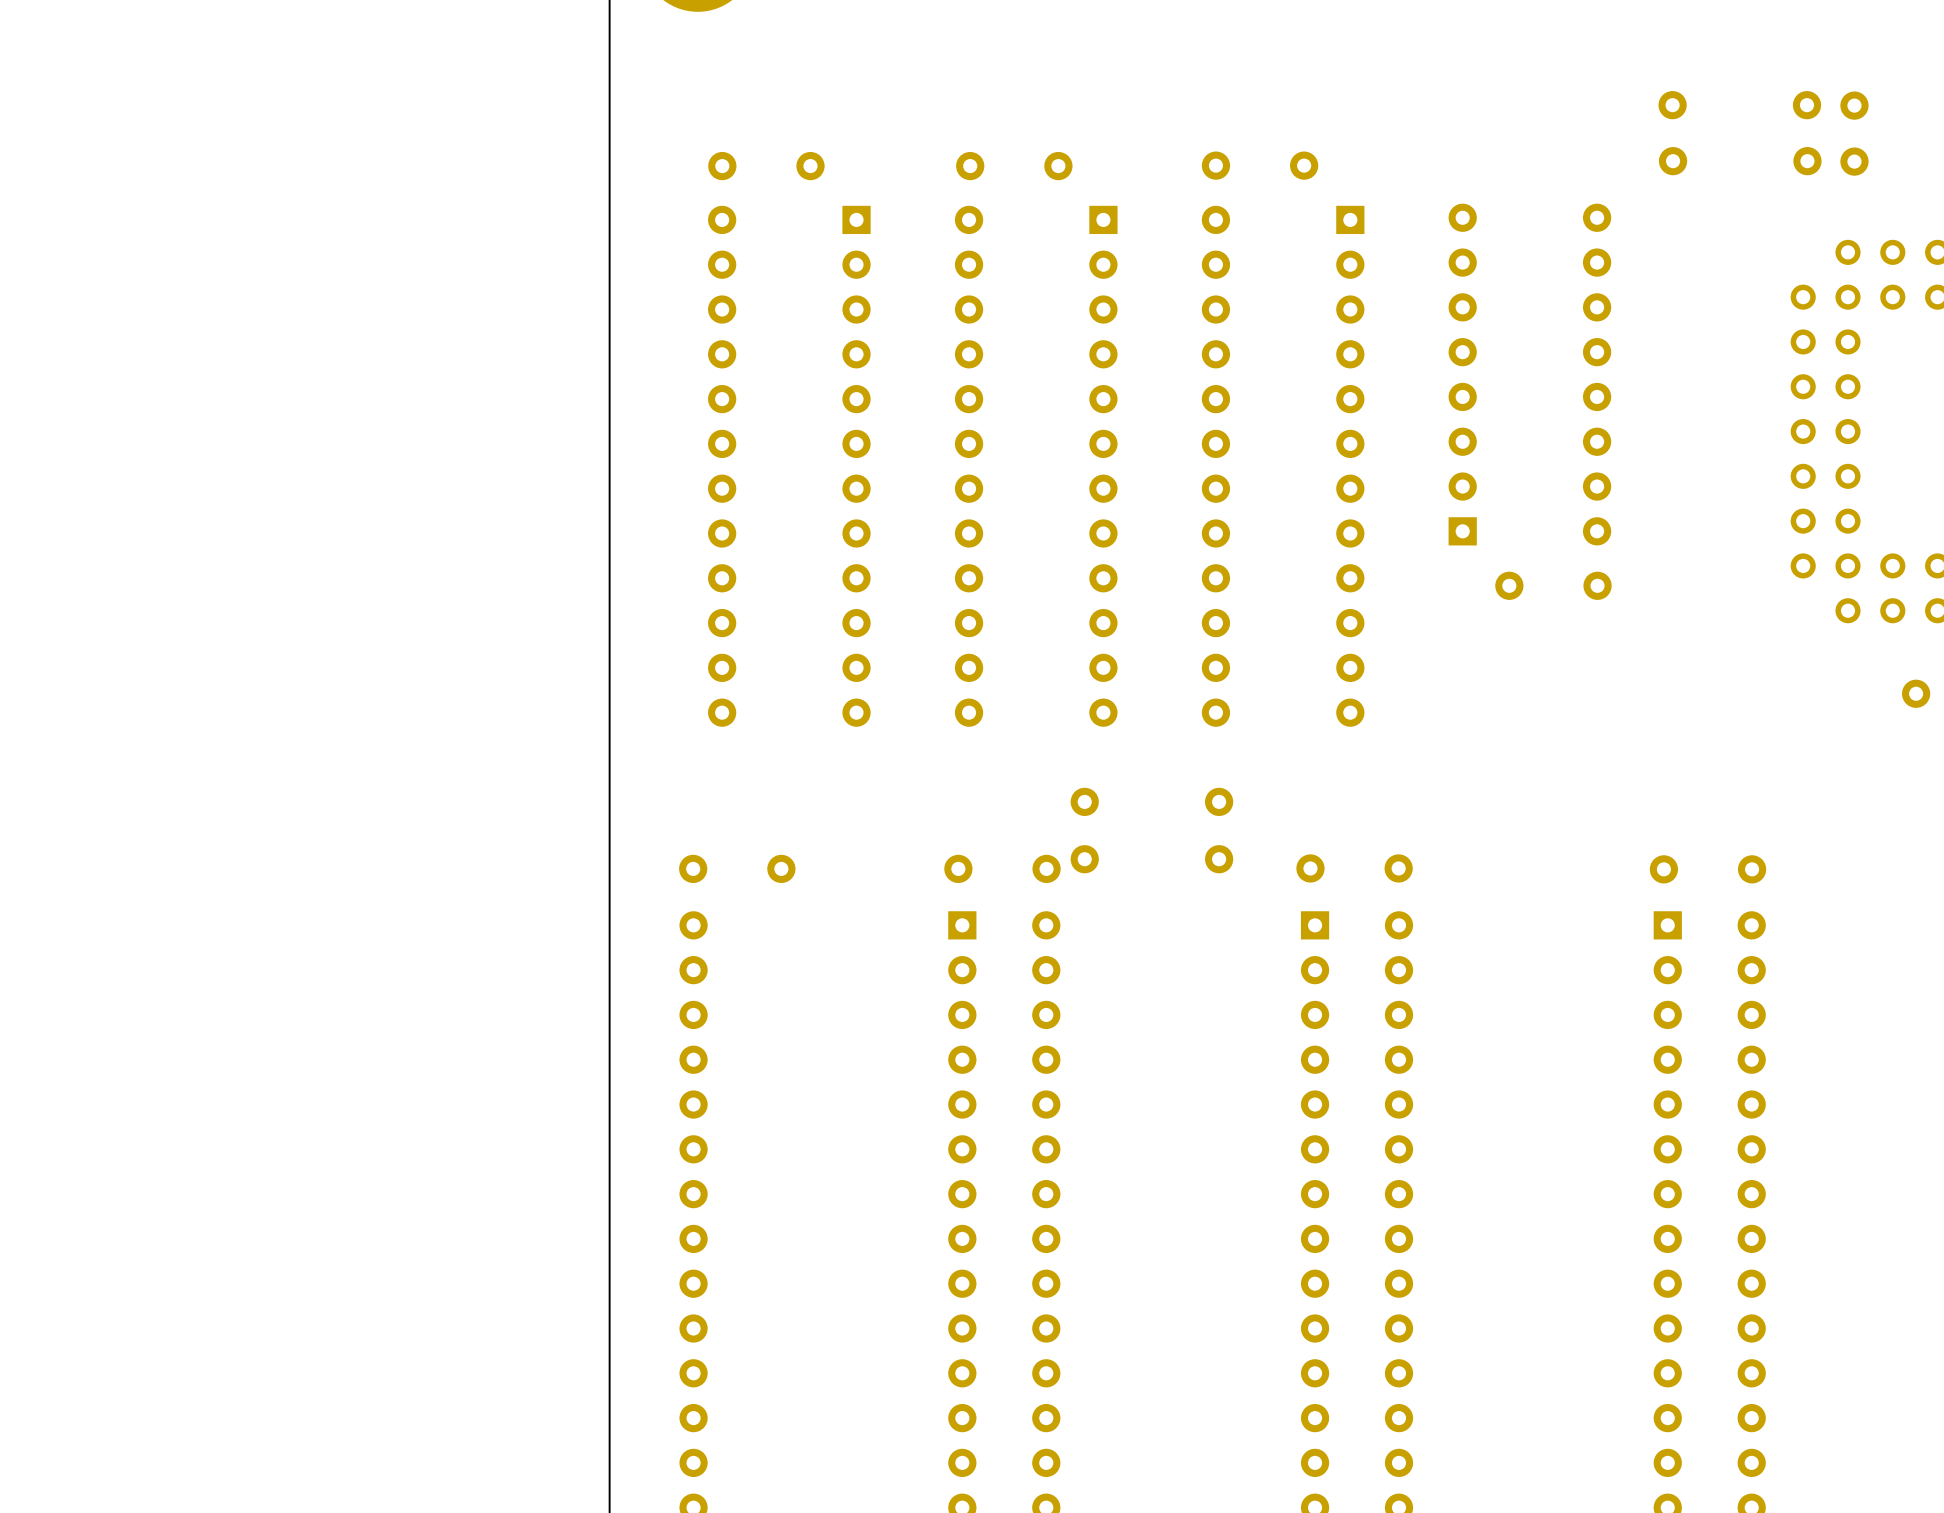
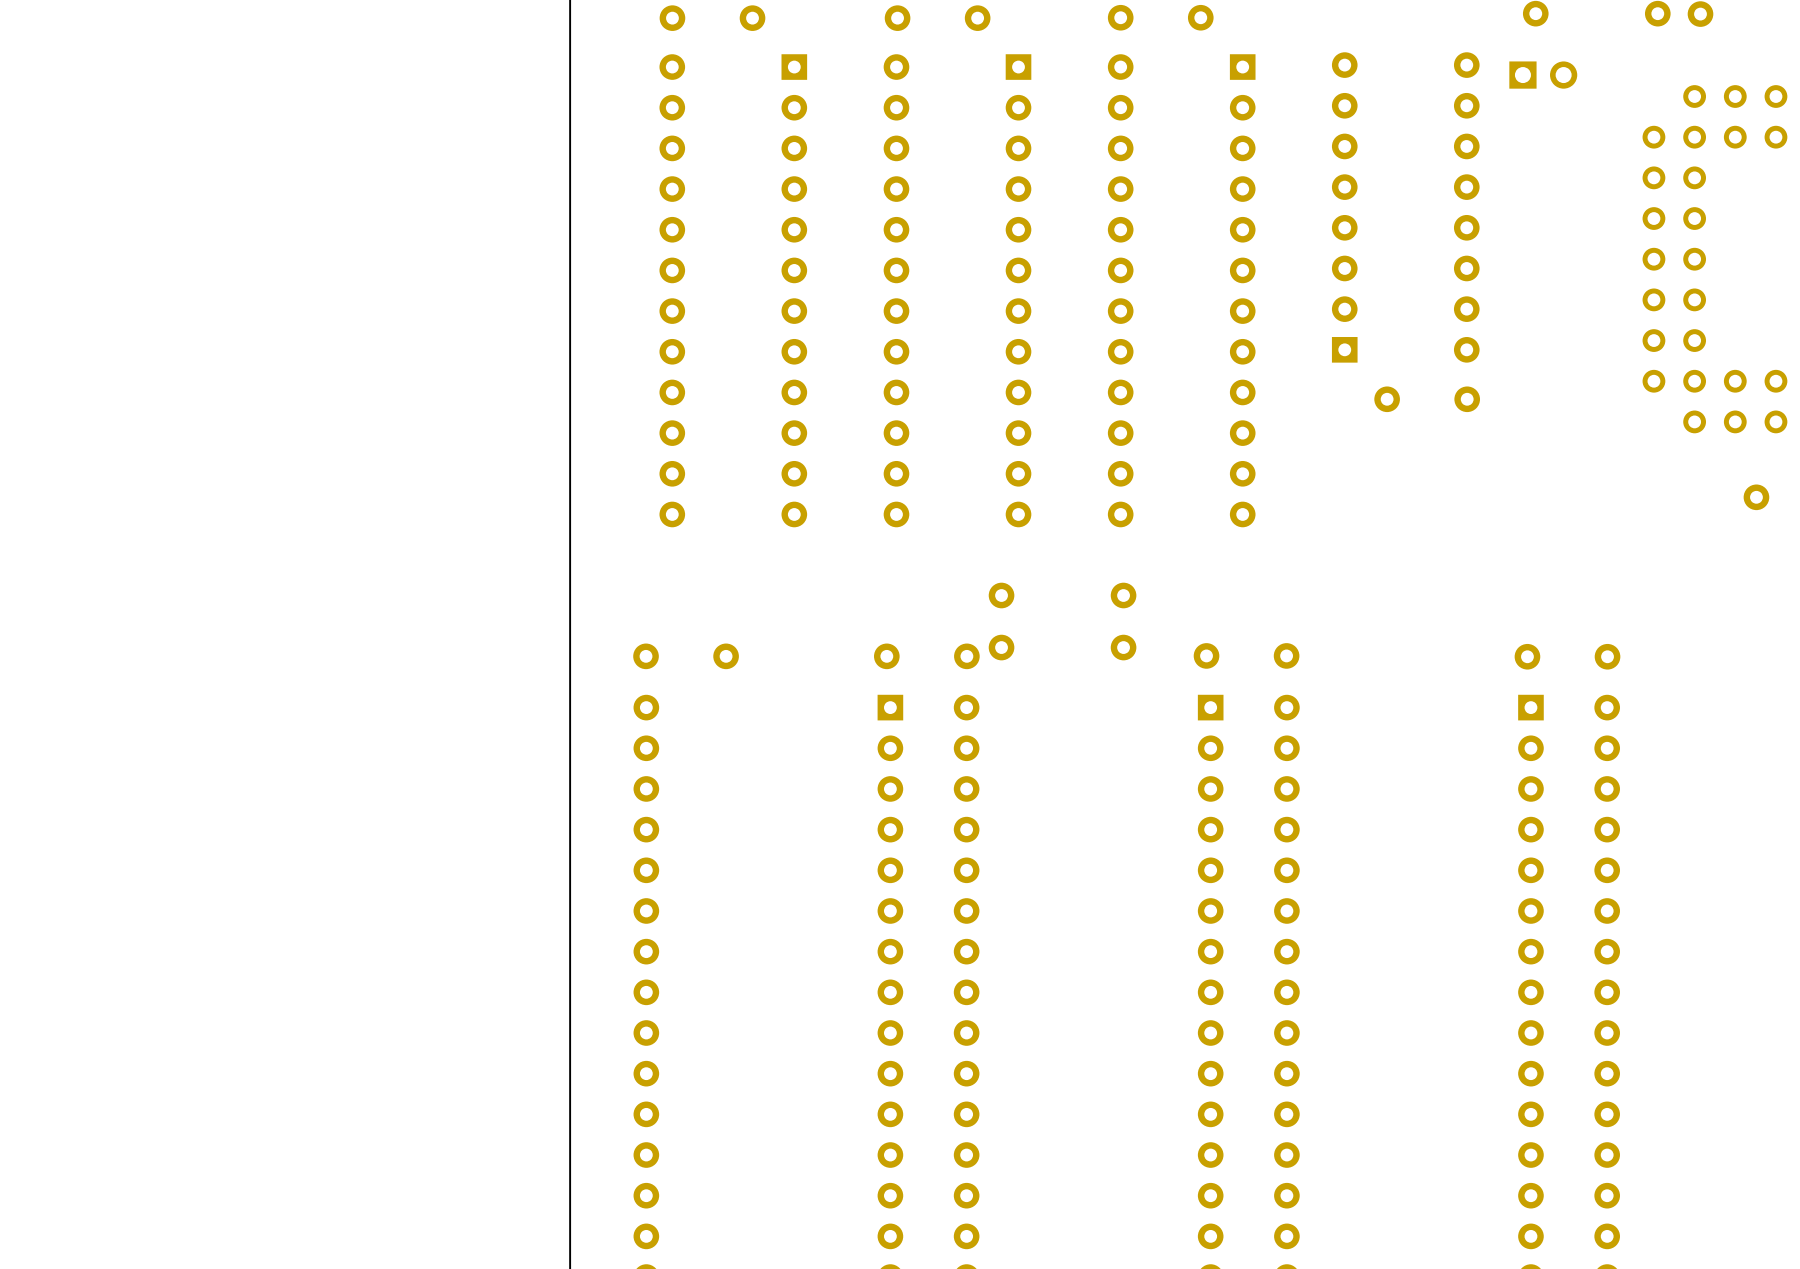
part: none -> (1543, 75)

